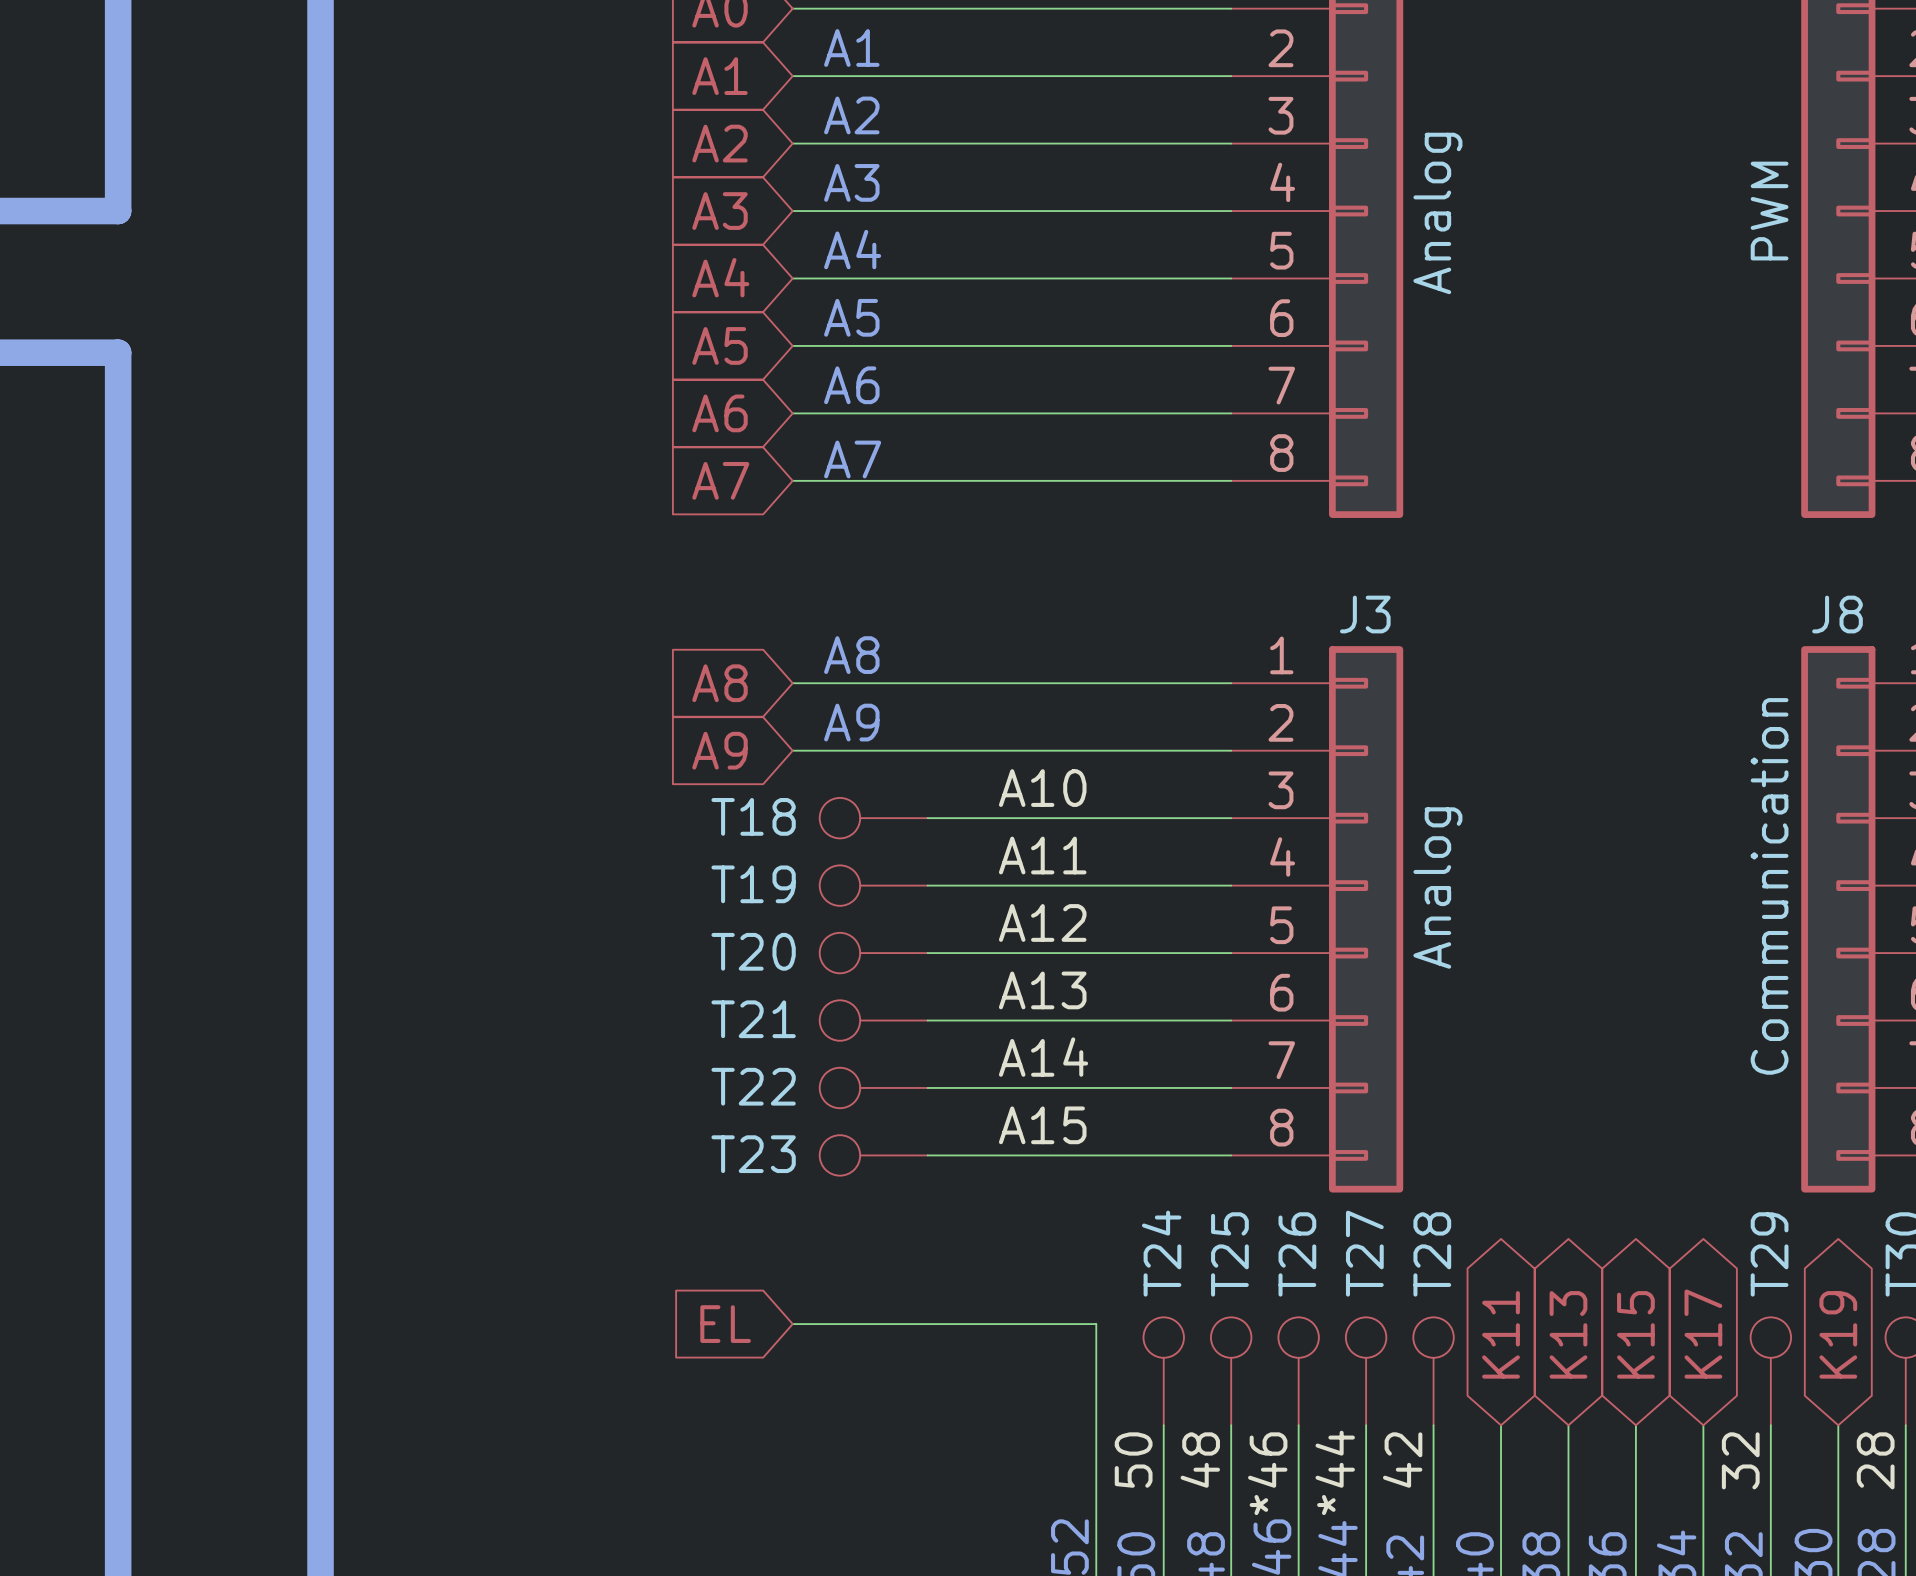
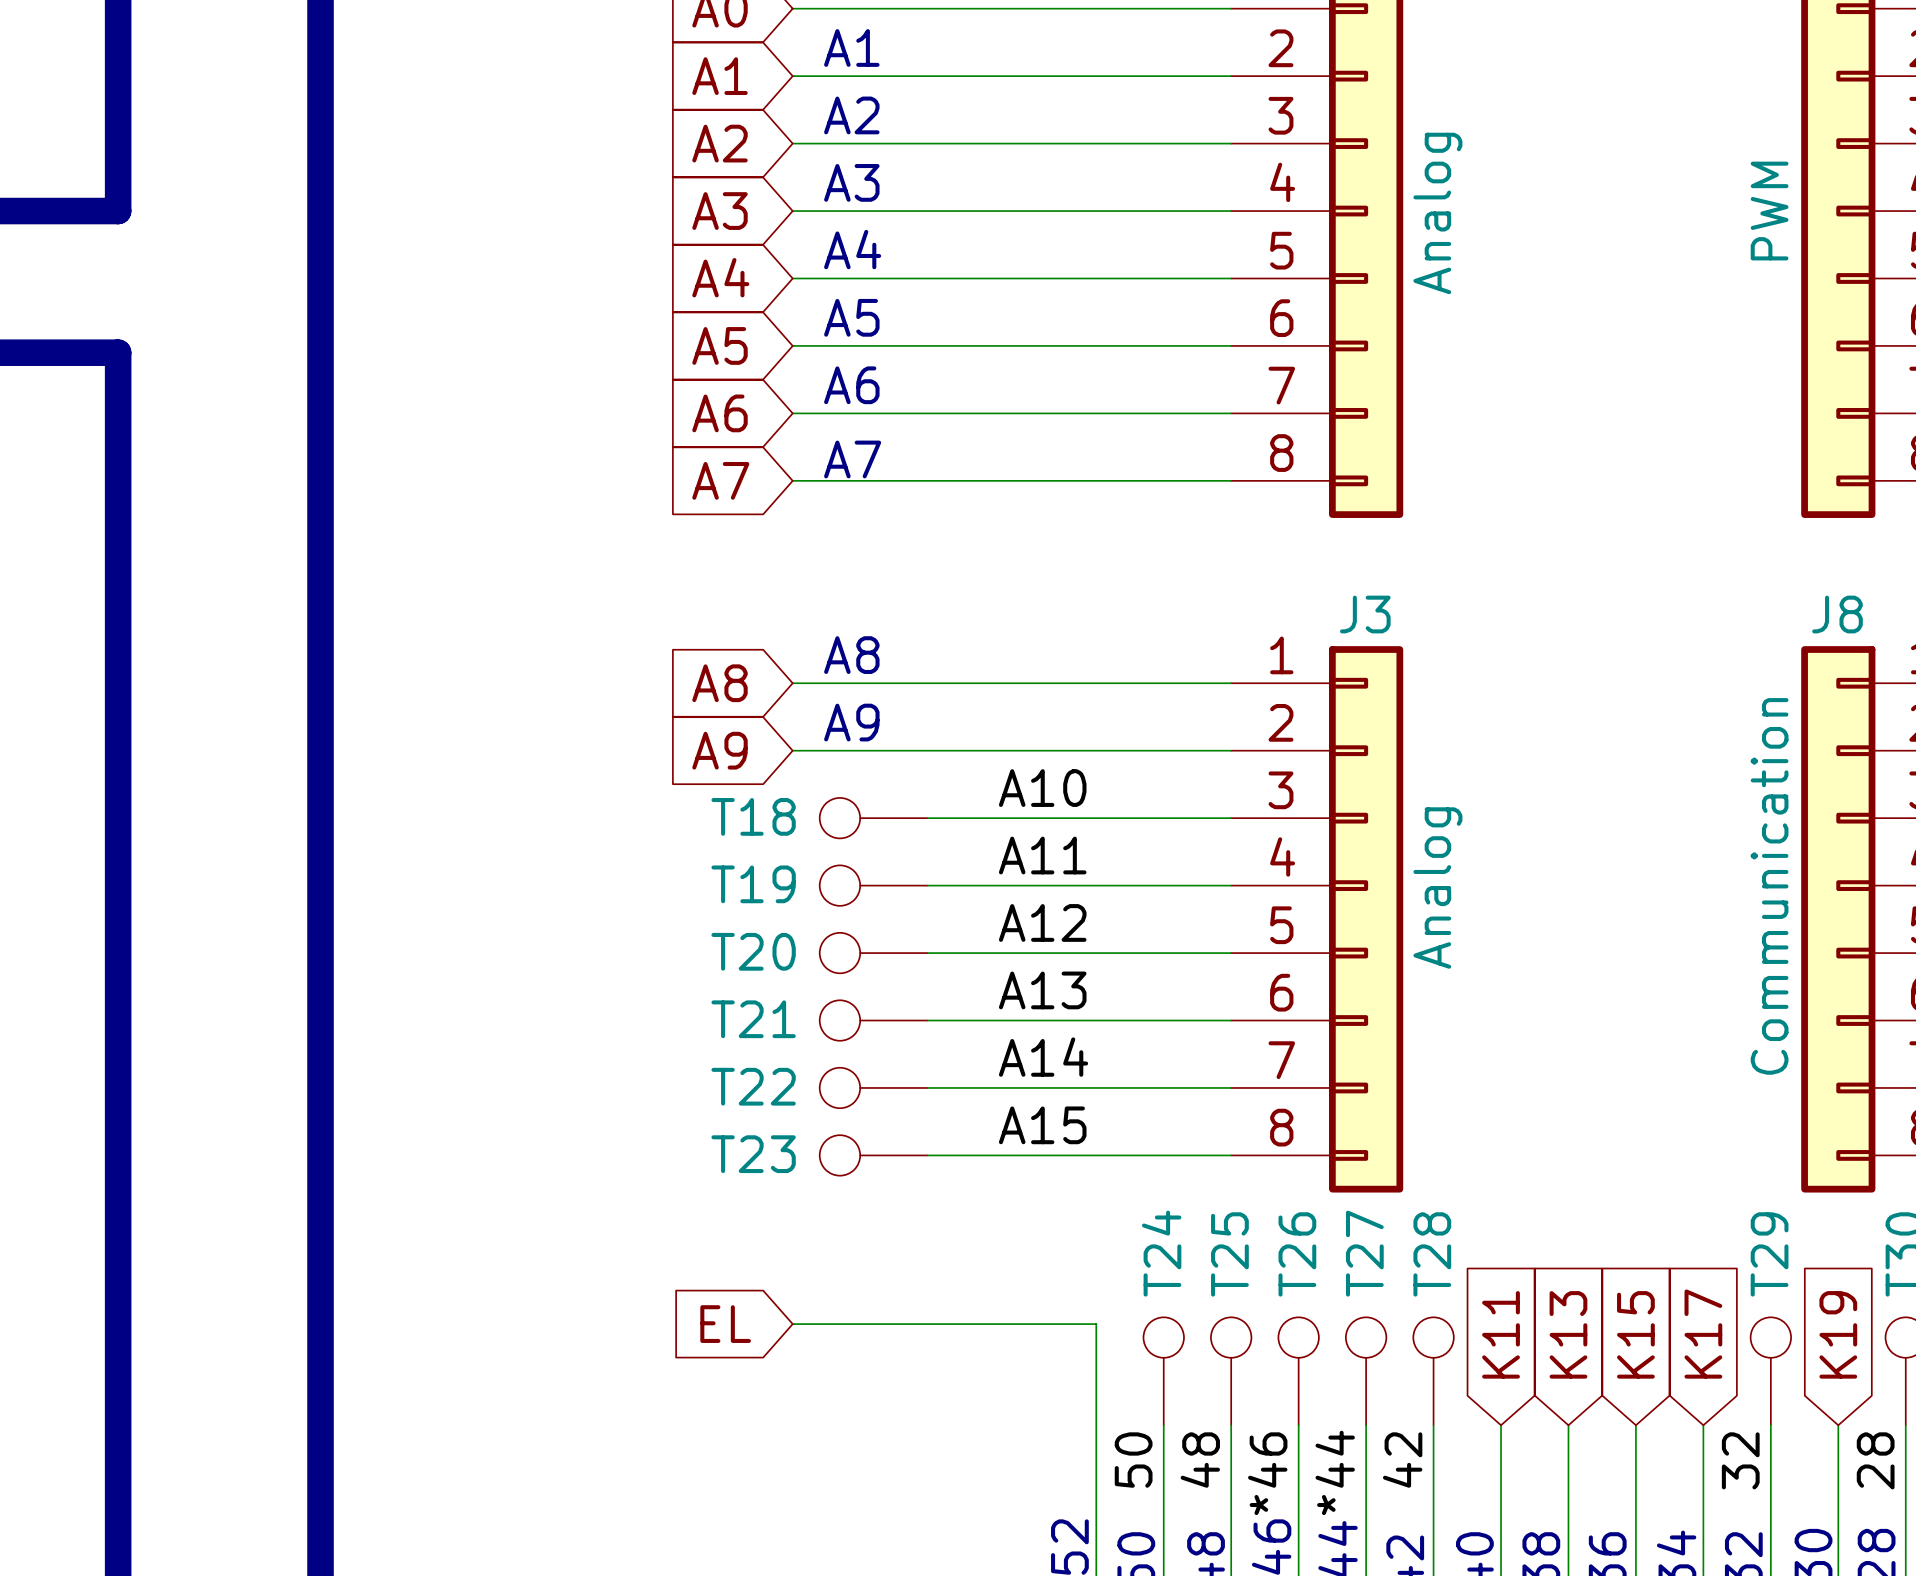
global label shape: bidirectional (1501, 1334) -> input (1501, 1334)
global label shape: bidirectional (1568, 1334) -> input (1568, 1334)
global label shape: bidirectional (1635, 1334) -> input (1635, 1334)
global label shape: bidirectional (1703, 1334) -> input (1703, 1334)
global label shape: bidirectional (1838, 1334) -> input (1838, 1334)

